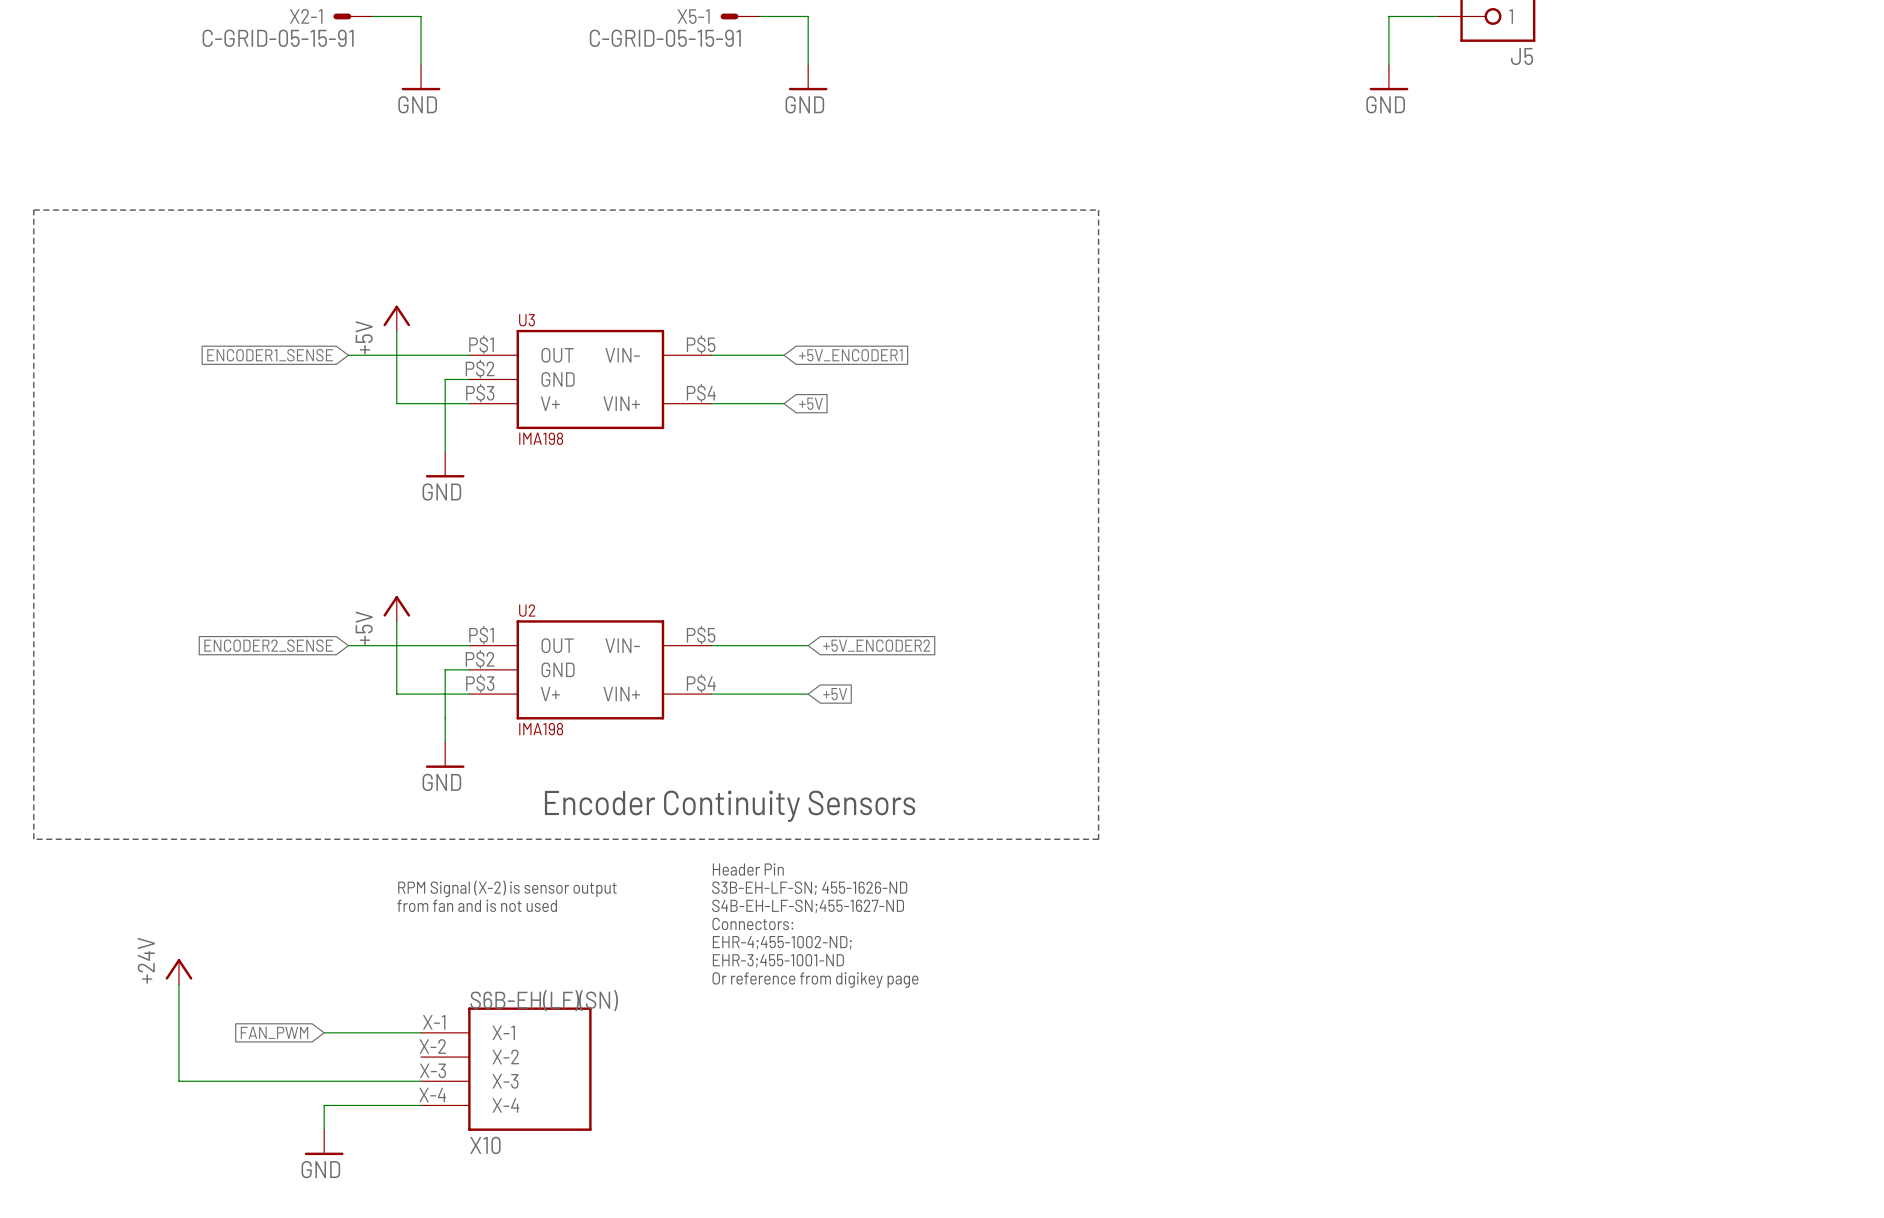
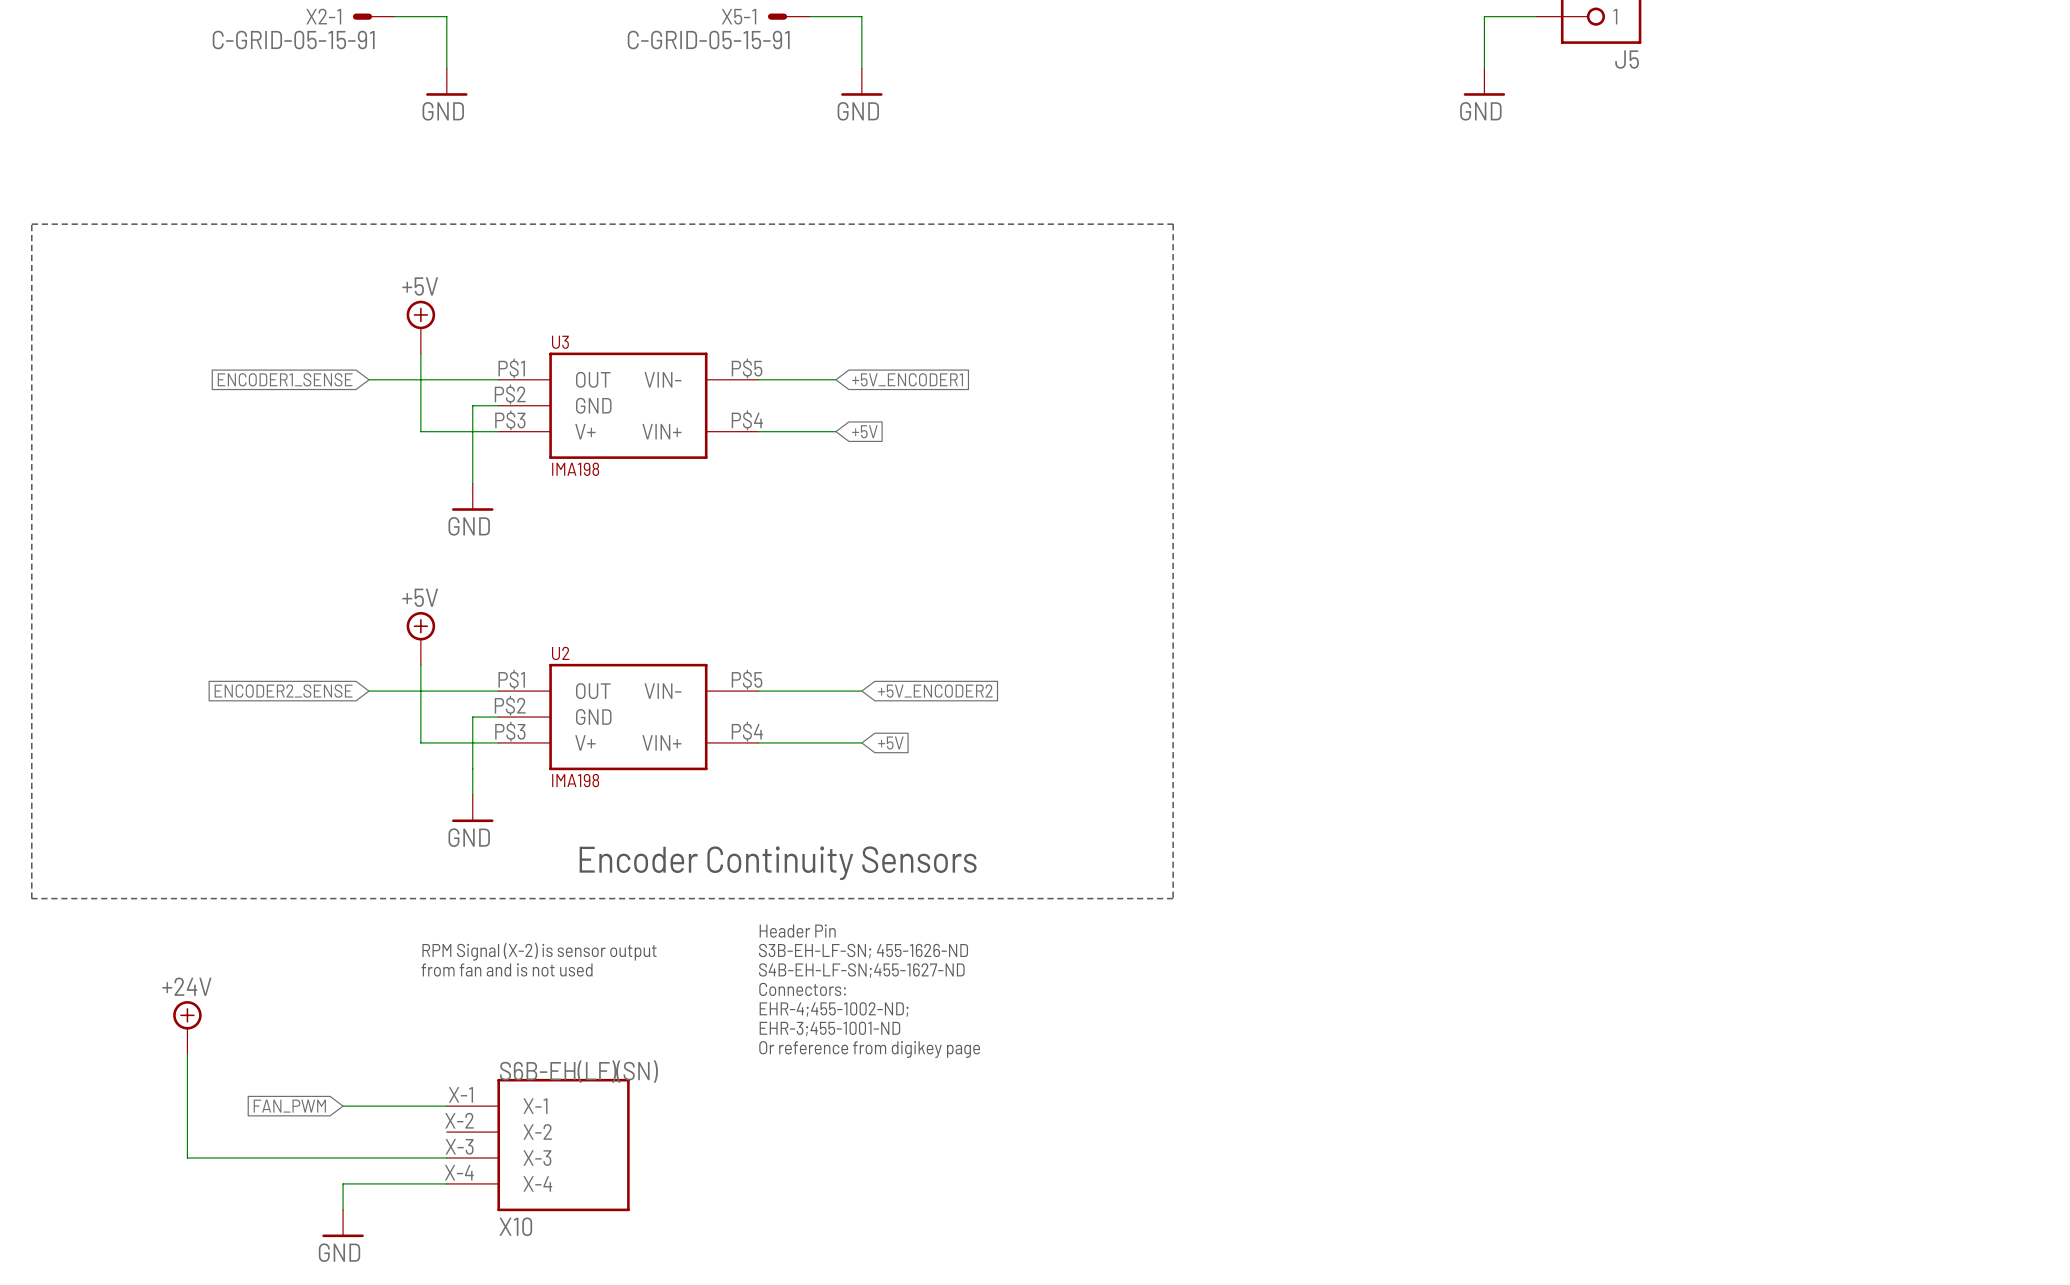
power symbol: none -> +5V (420, 327)
power symbol: +5V (396, 318) -> none
power symbol: none -> +5V (420, 638)
power symbol: +5V (396, 608) -> none
power symbol: none -> +24V (187, 1027)
power symbol: +24V (178, 971) -> none

